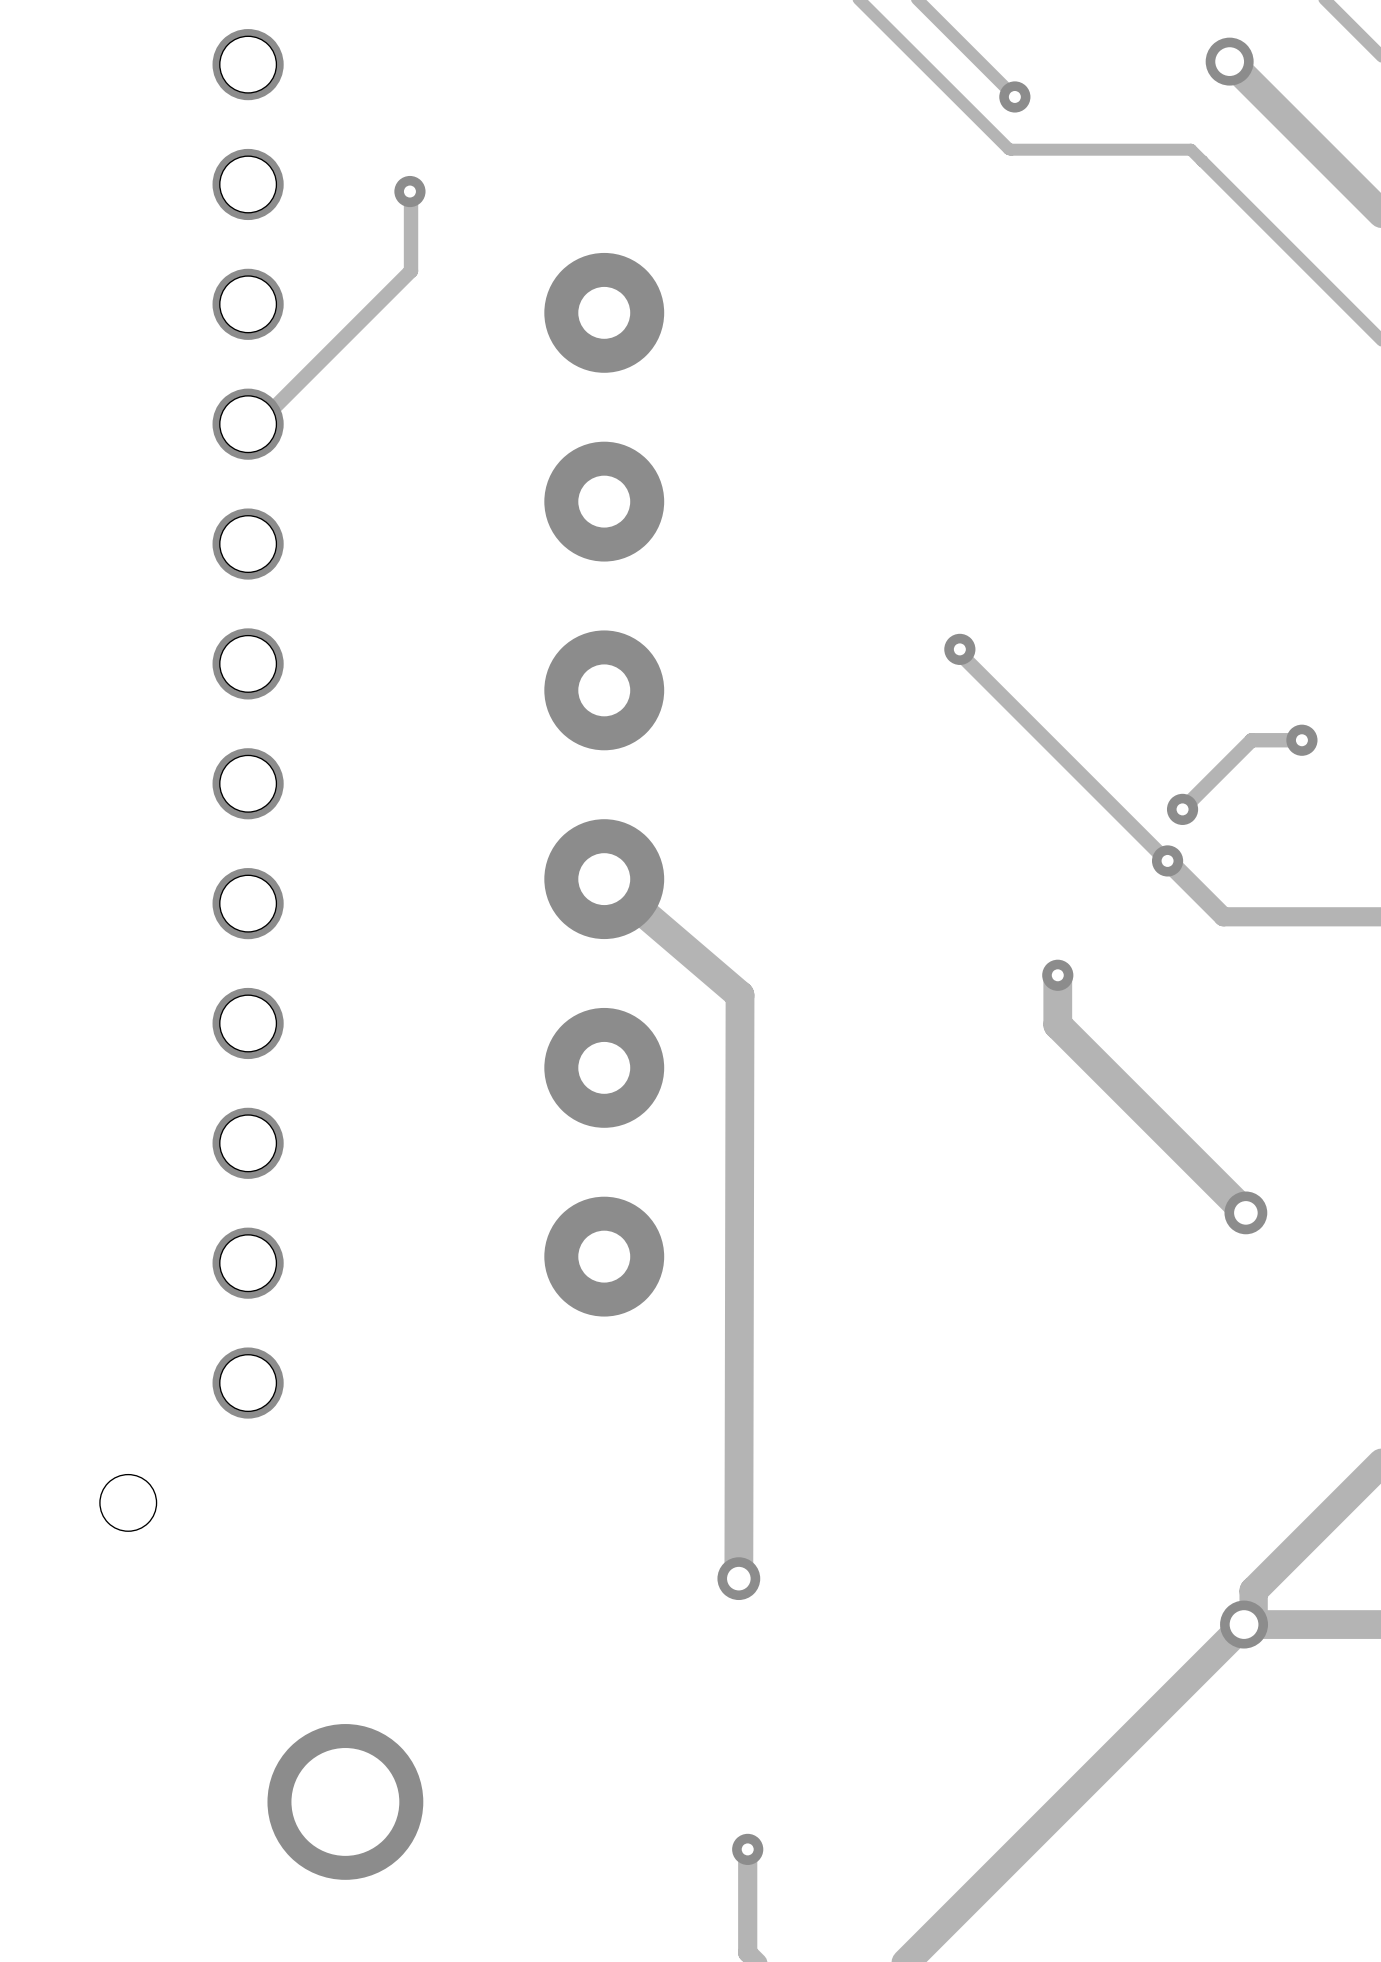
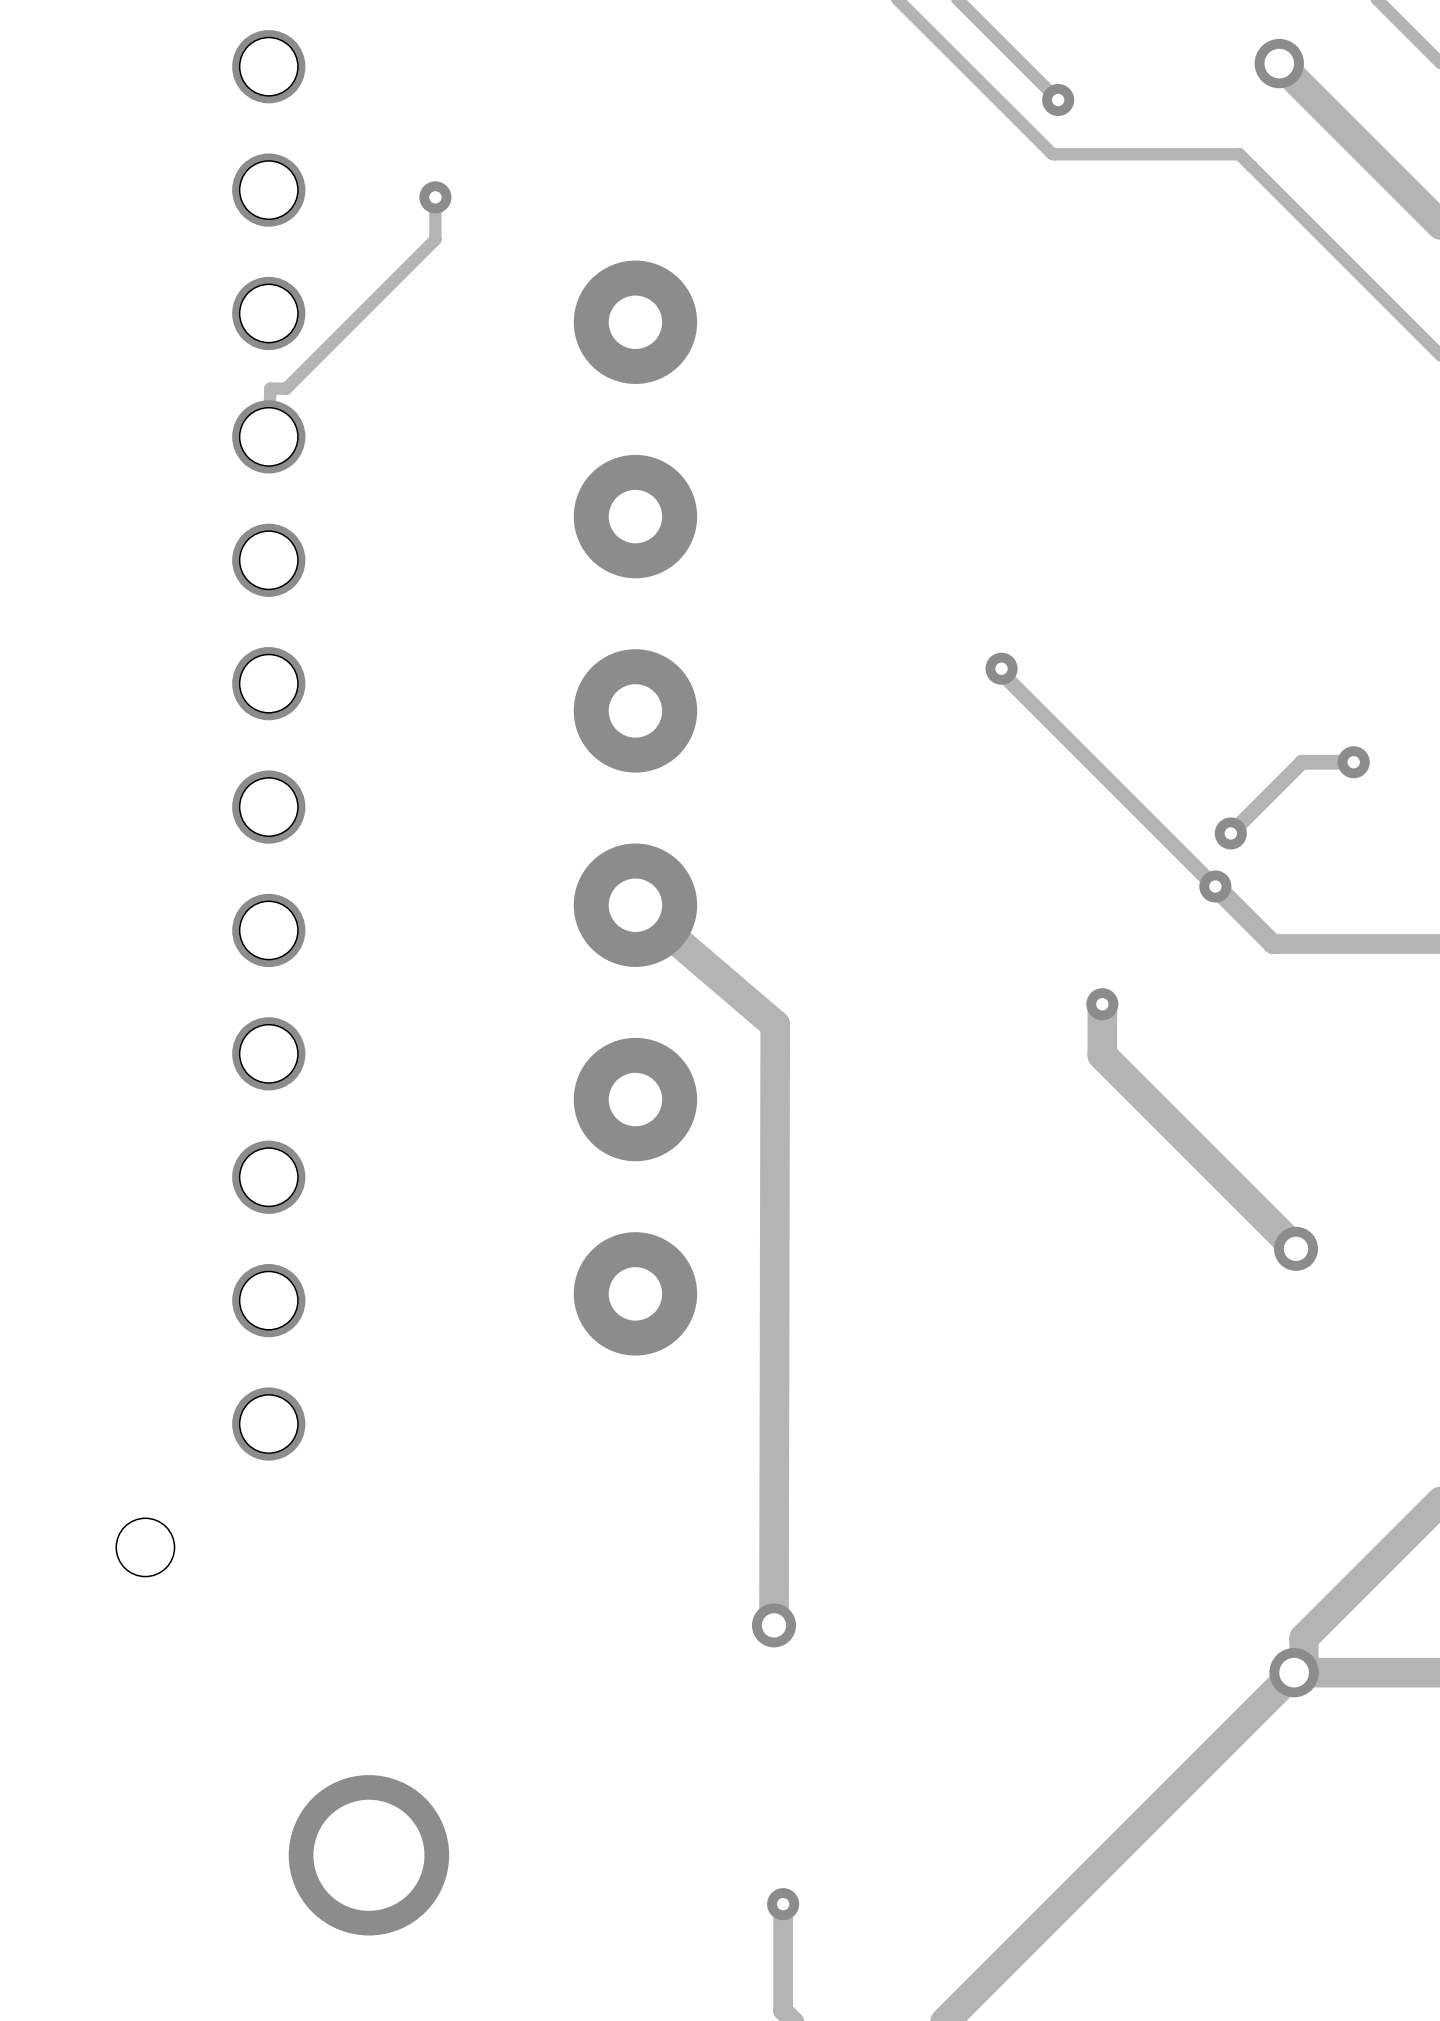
track: (409, 191) (411, 270) (257, 424) (248, 424) -> (435, 197) (435, 239) (286, 388) (270, 388) (268, 436)

